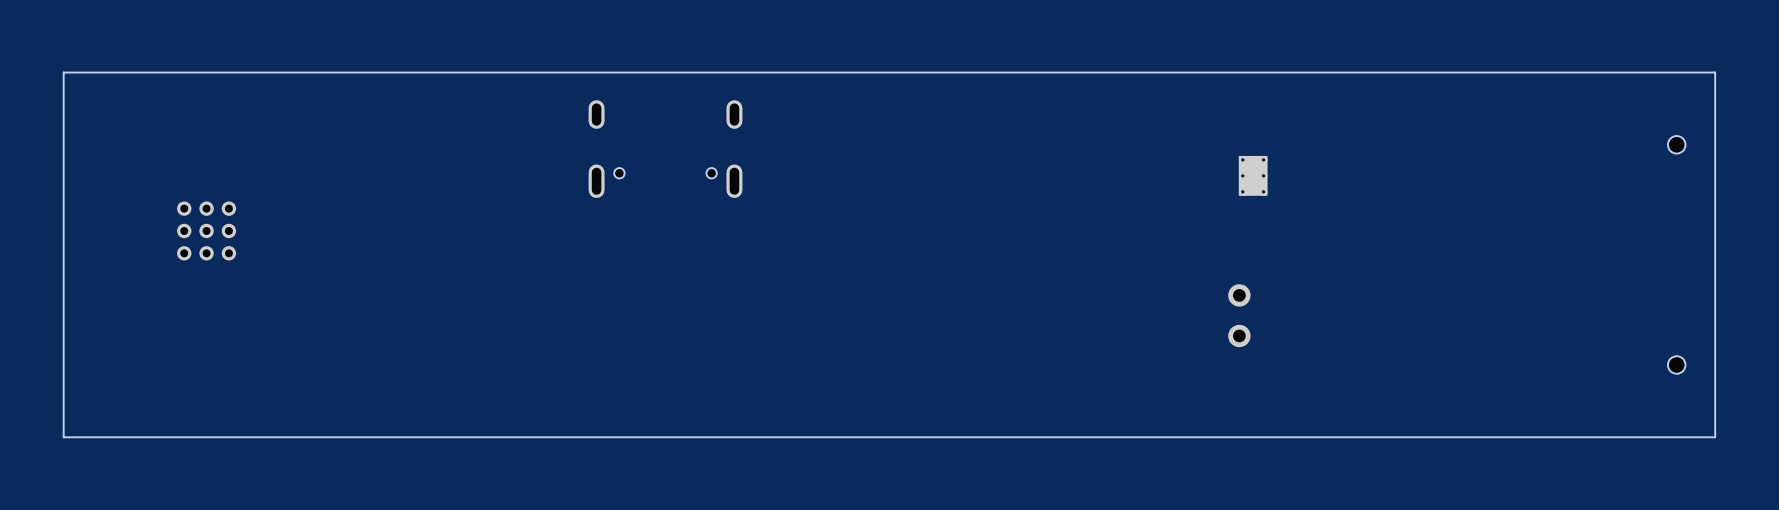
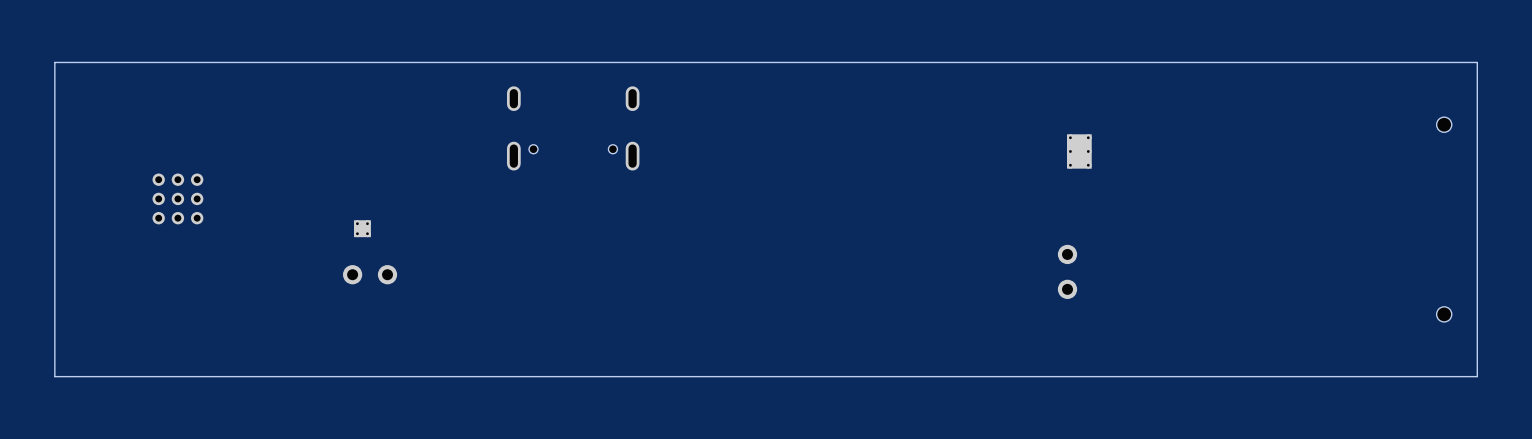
part: none -> (362, 228)
part: none -> (370, 274)

